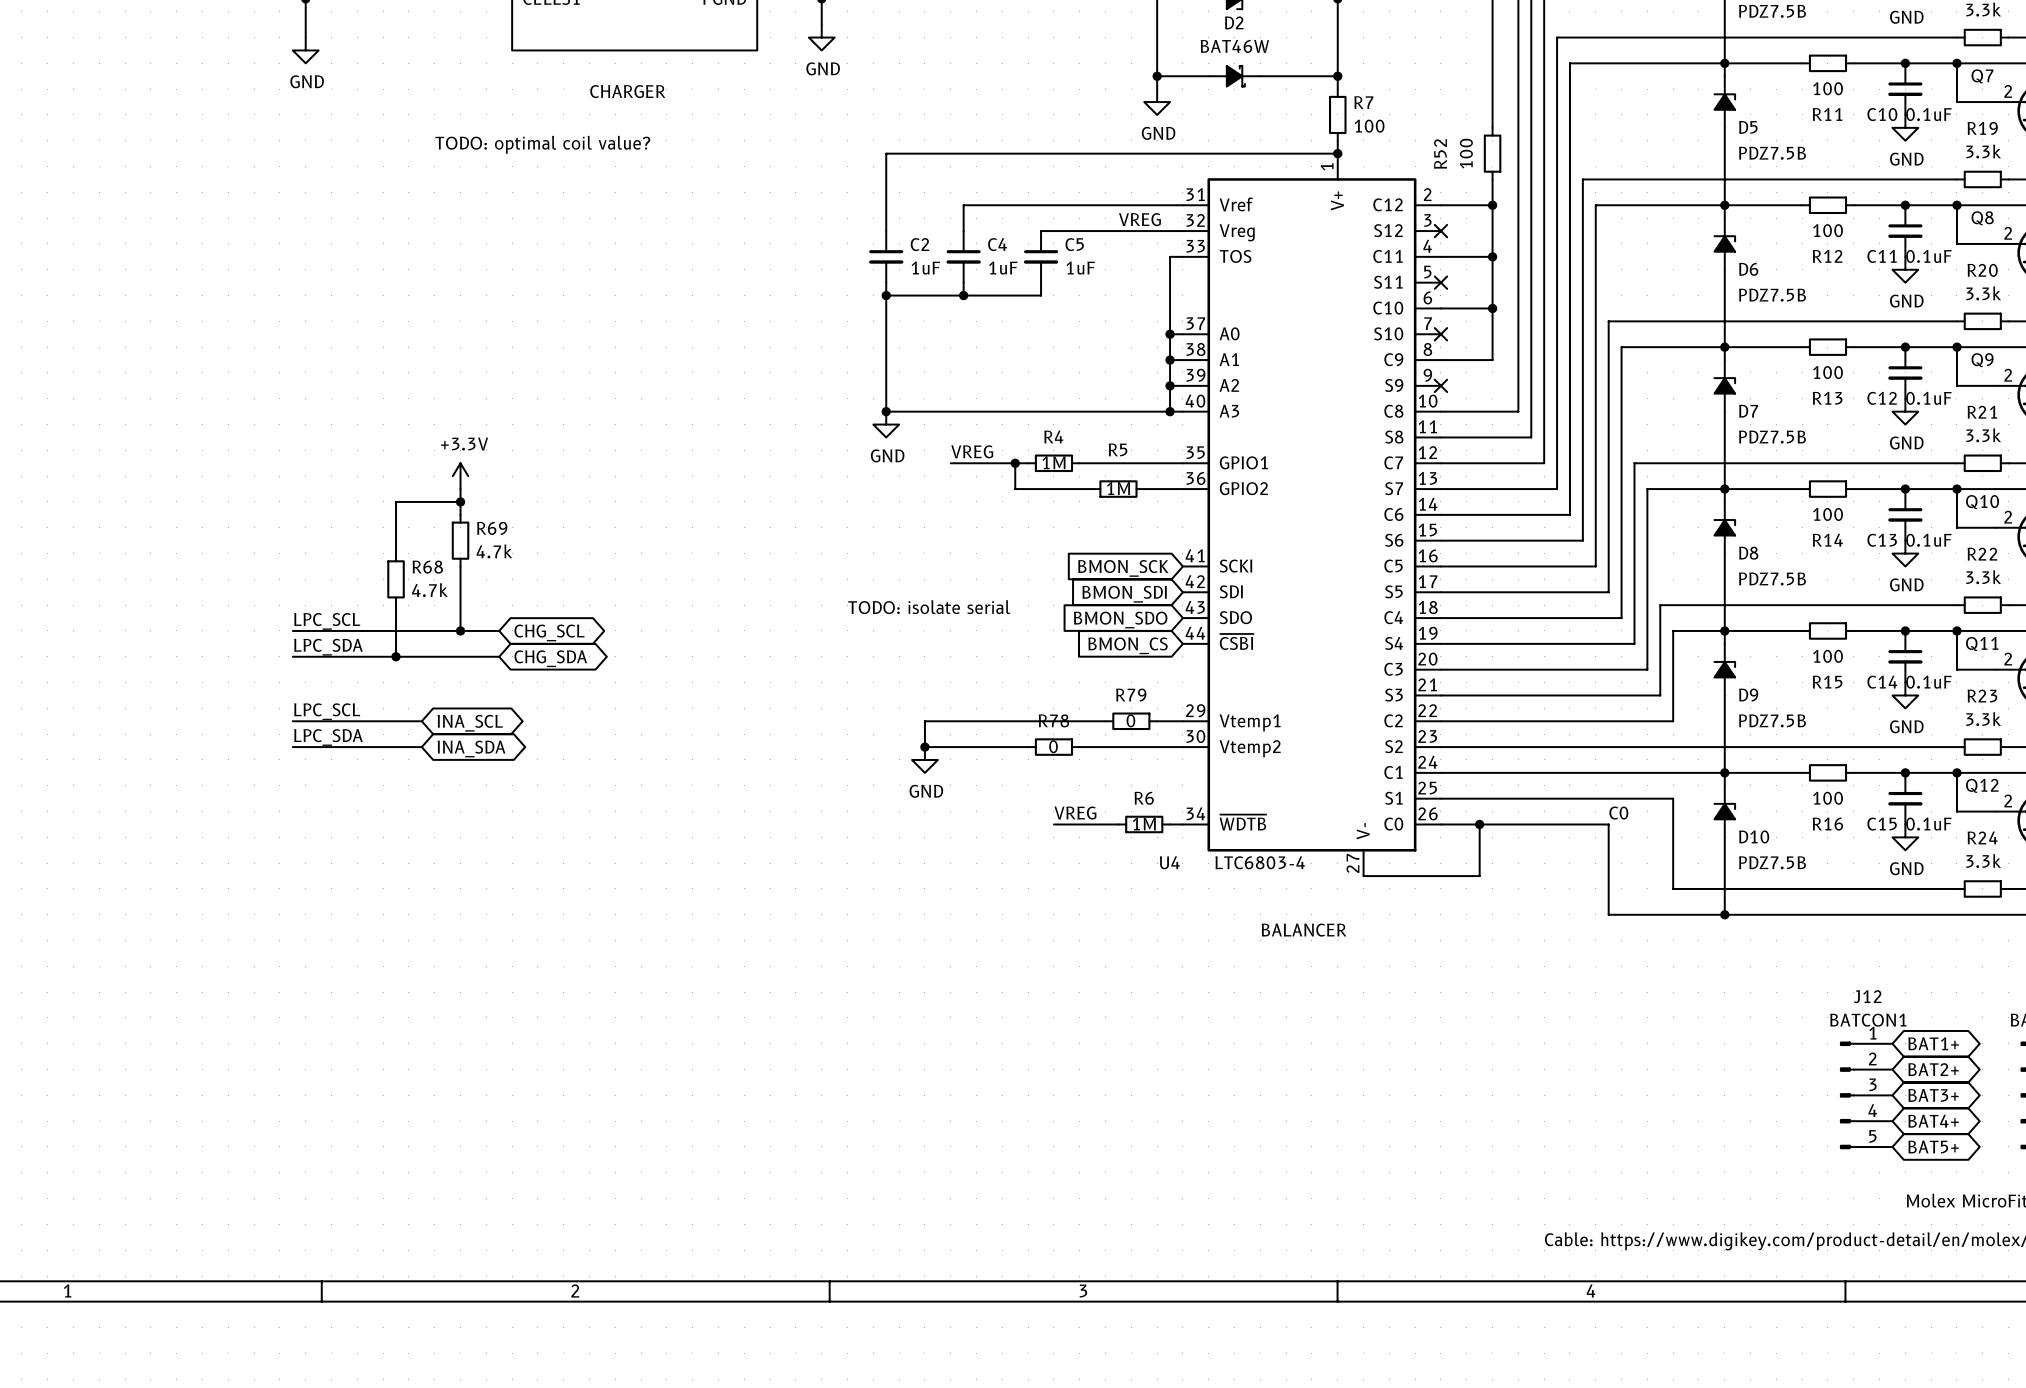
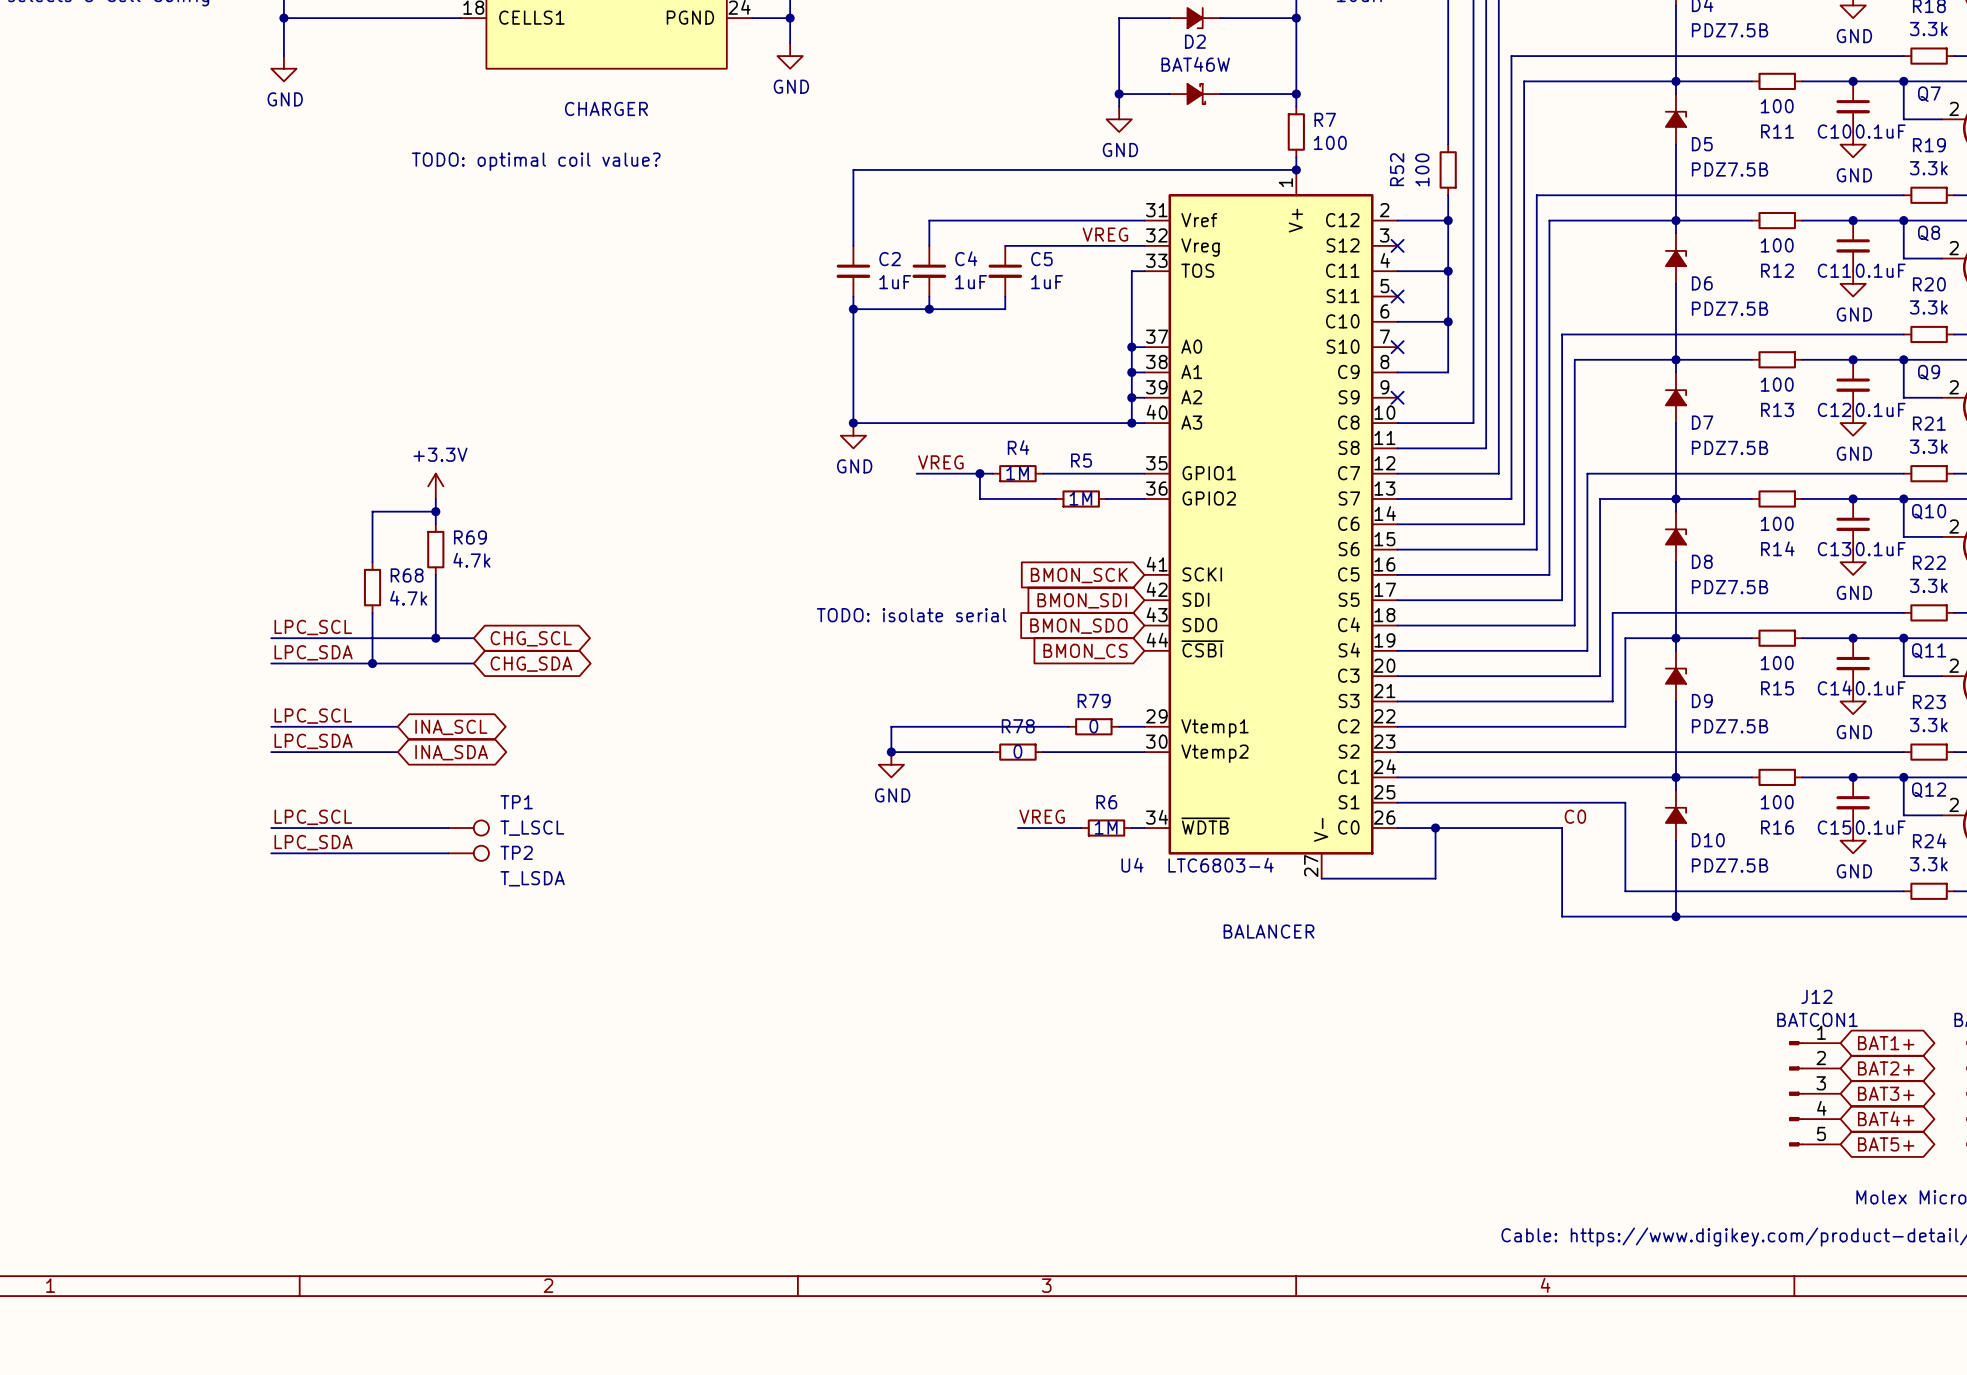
label: none -> LPC_SCL (313, 817)
wire: none -> (271, 828) (448, 828)
TP1: none -> T_LSCL (468, 828)
label: none -> LPC_SDA (313, 842)
wire: none -> (271, 853) (448, 853)
TP2: none -> T_LSDA (468, 853)

